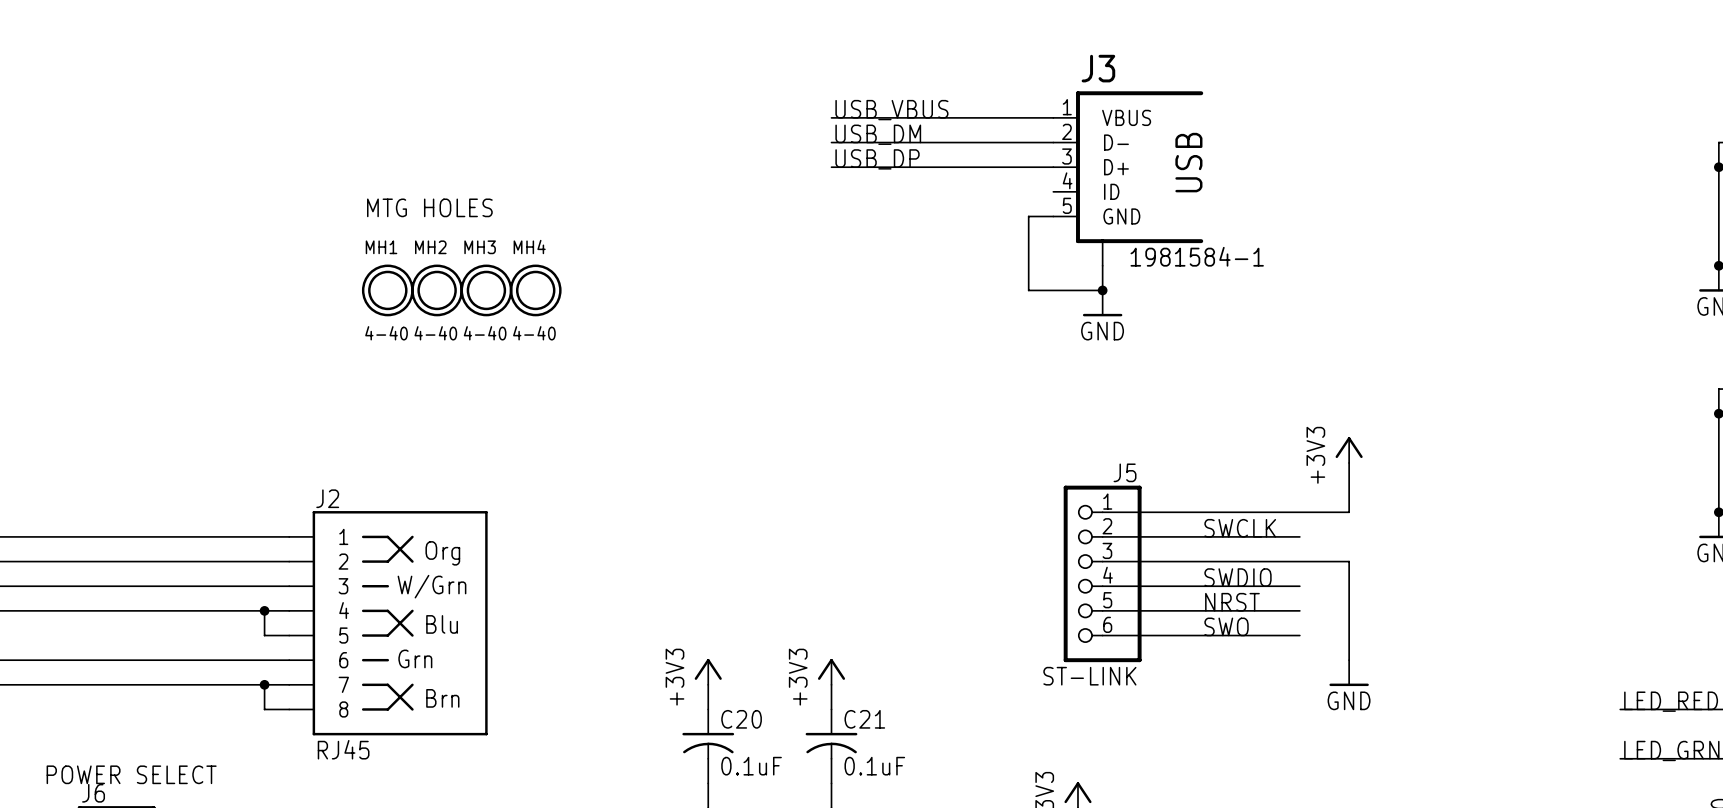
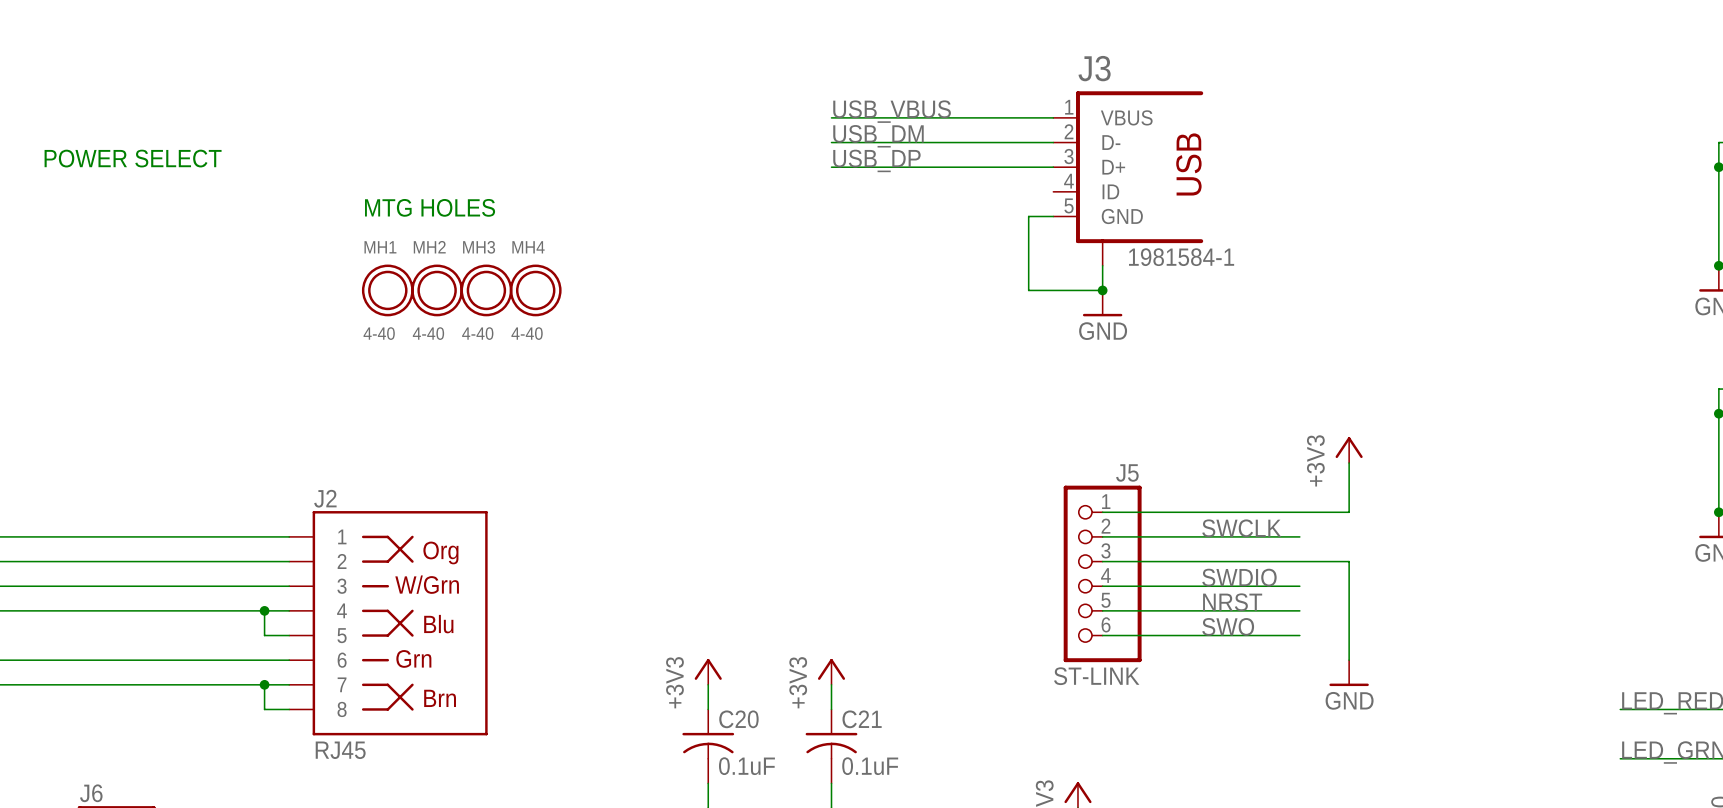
text: none -> POWER SELECT (133, 158)
text: POWER SELECT (131, 774) -> none

